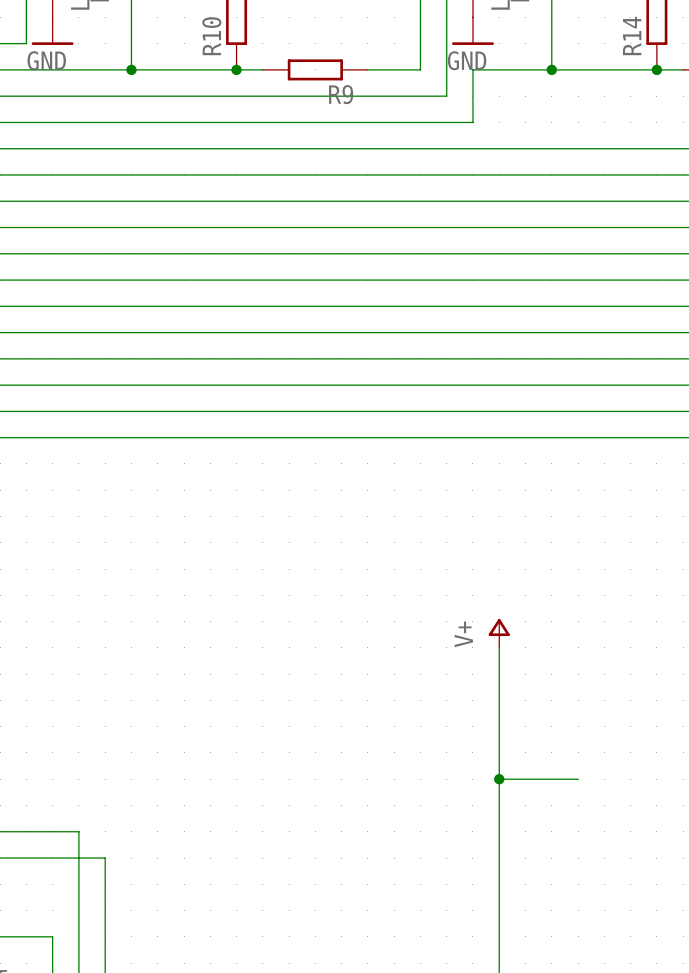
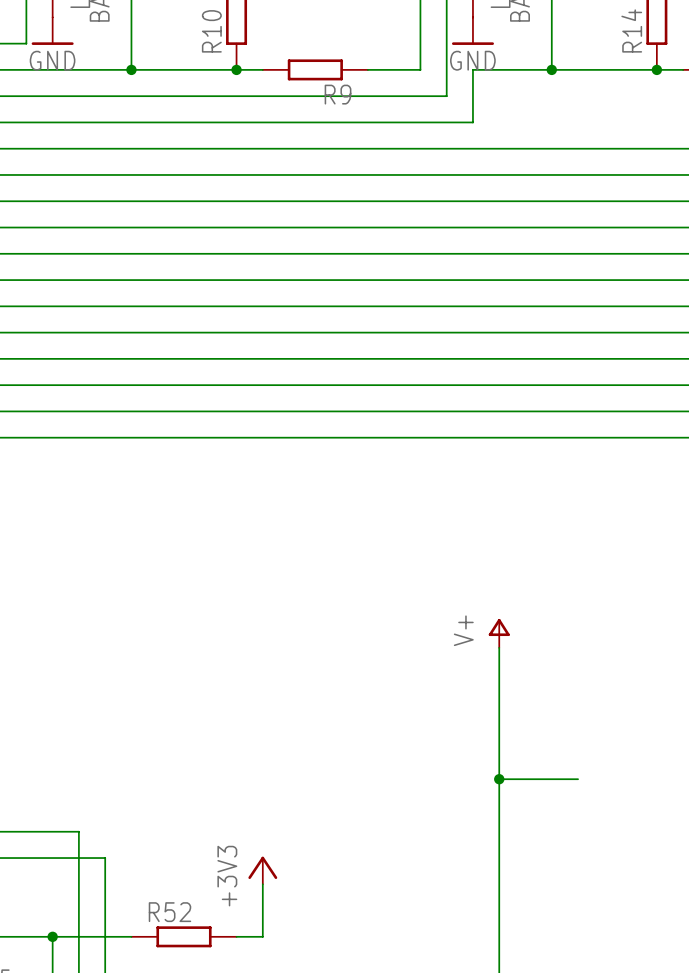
power symbol: none -> +3V3 (262, 870)
wire: none -> (262, 884) (262, 936) (236, 936)
wire: none -> (52, 936) (131, 936)
junction: none -> (52, 936)
R52: none -> (184, 936)

